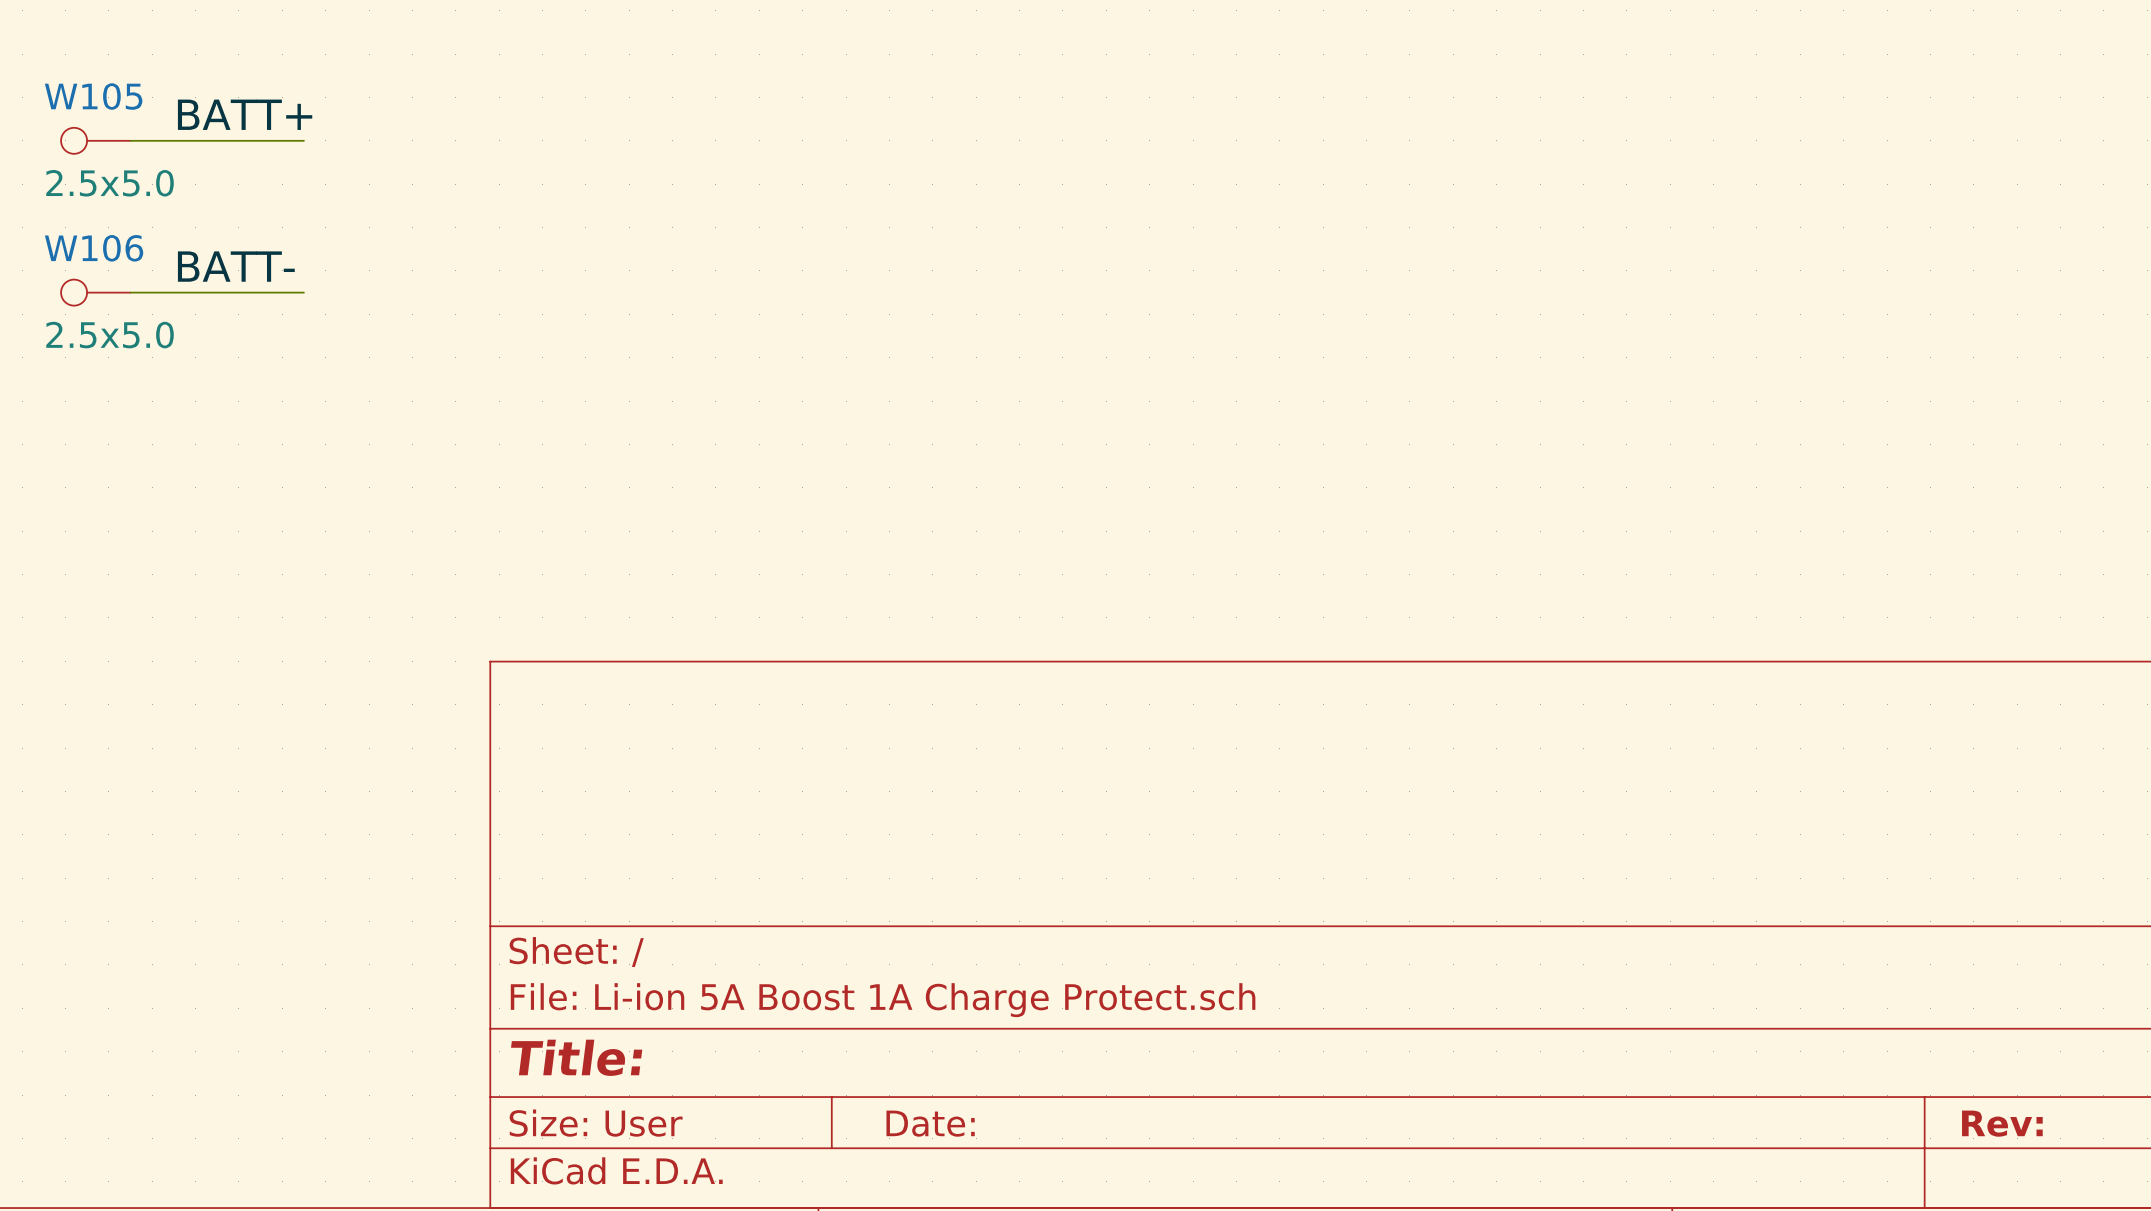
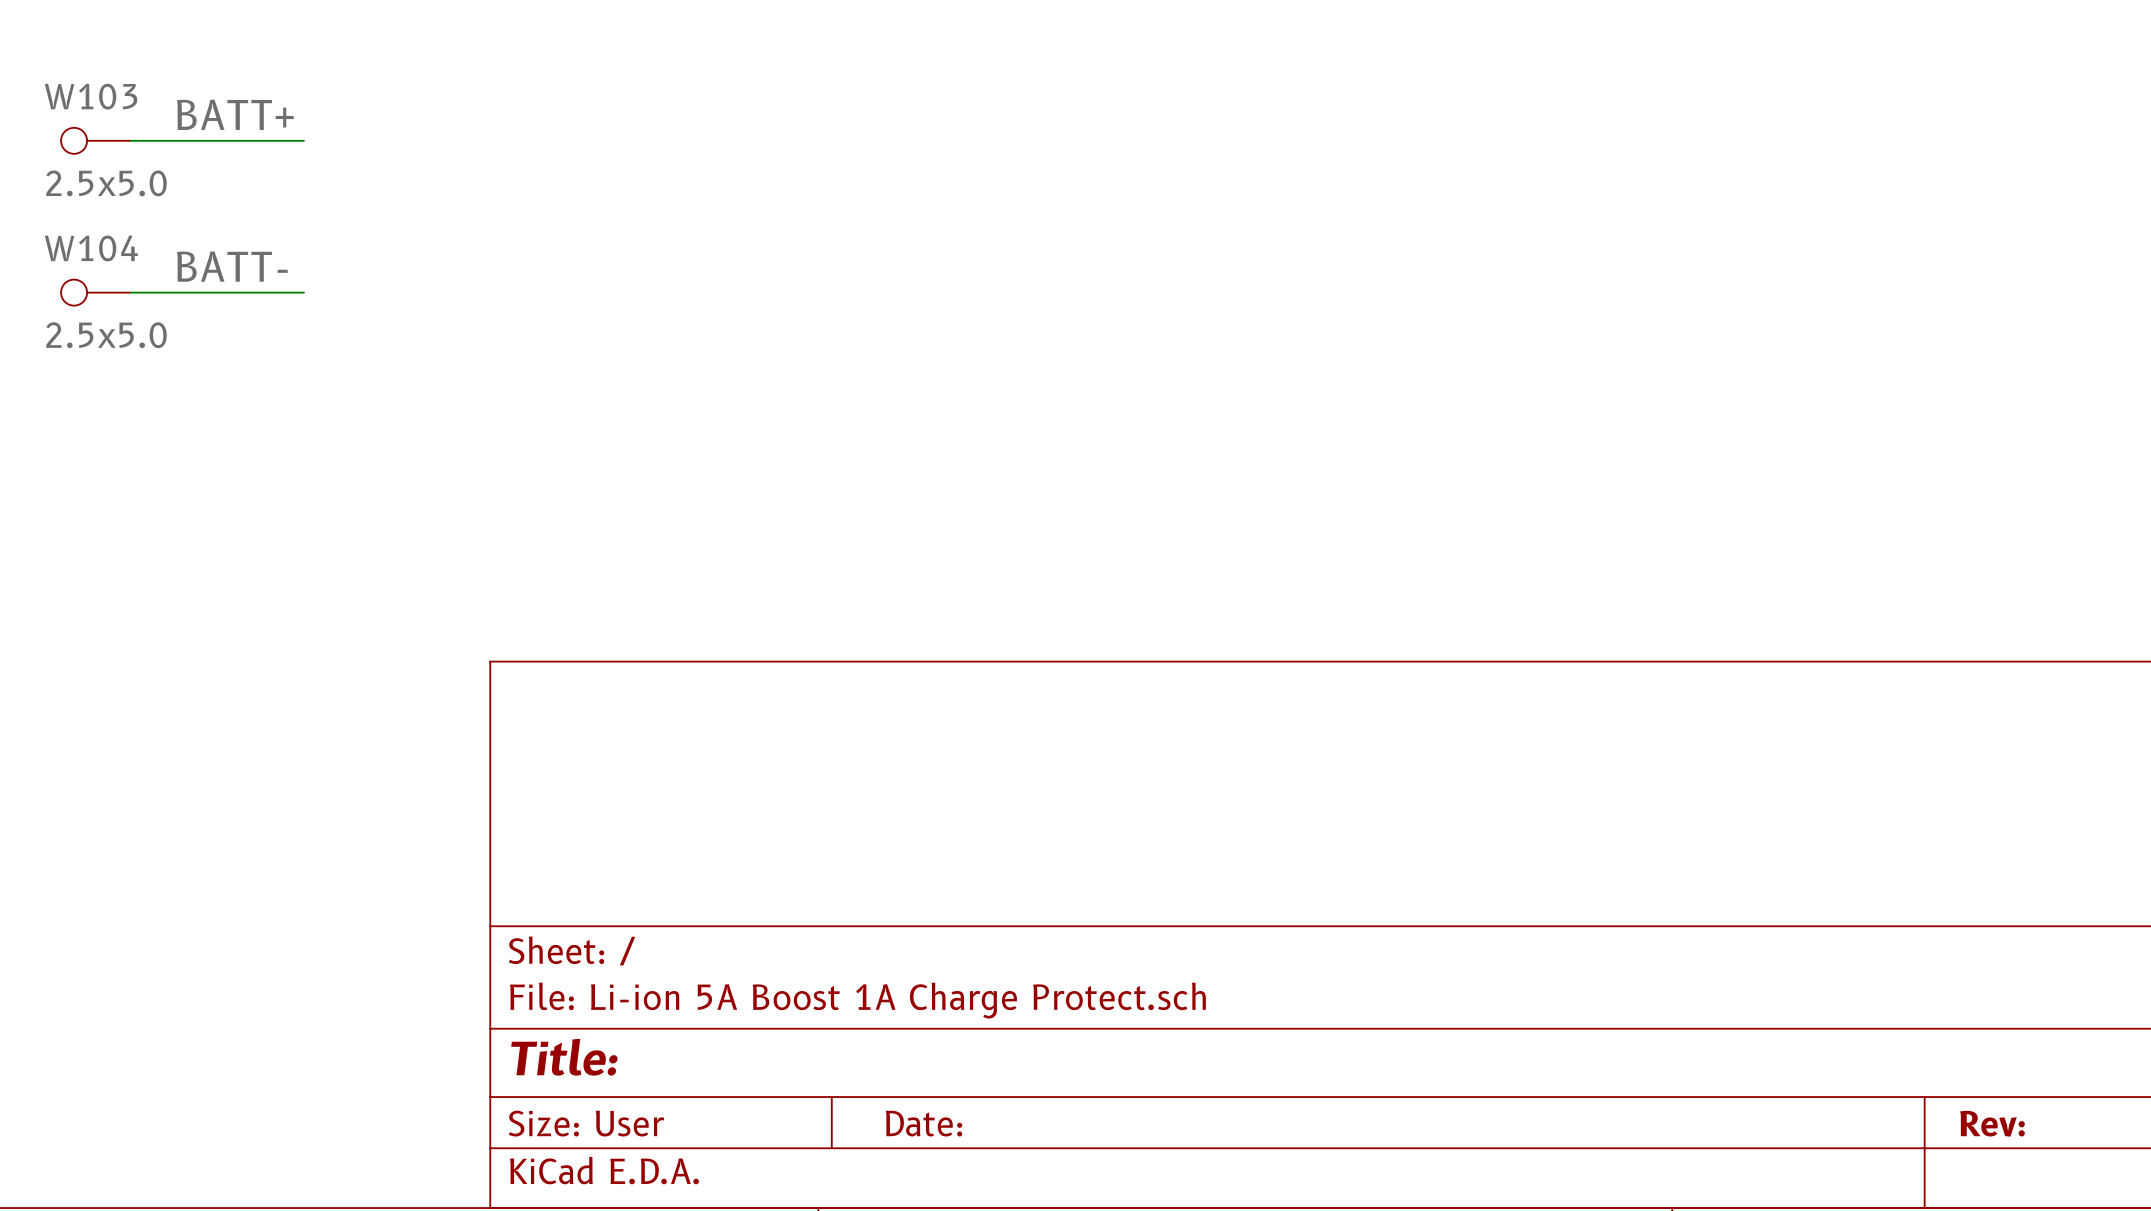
W105 name: W105 (93, 96) -> W103 (91, 96)
W106 name: W106 (94, 248) -> W104 (91, 248)

